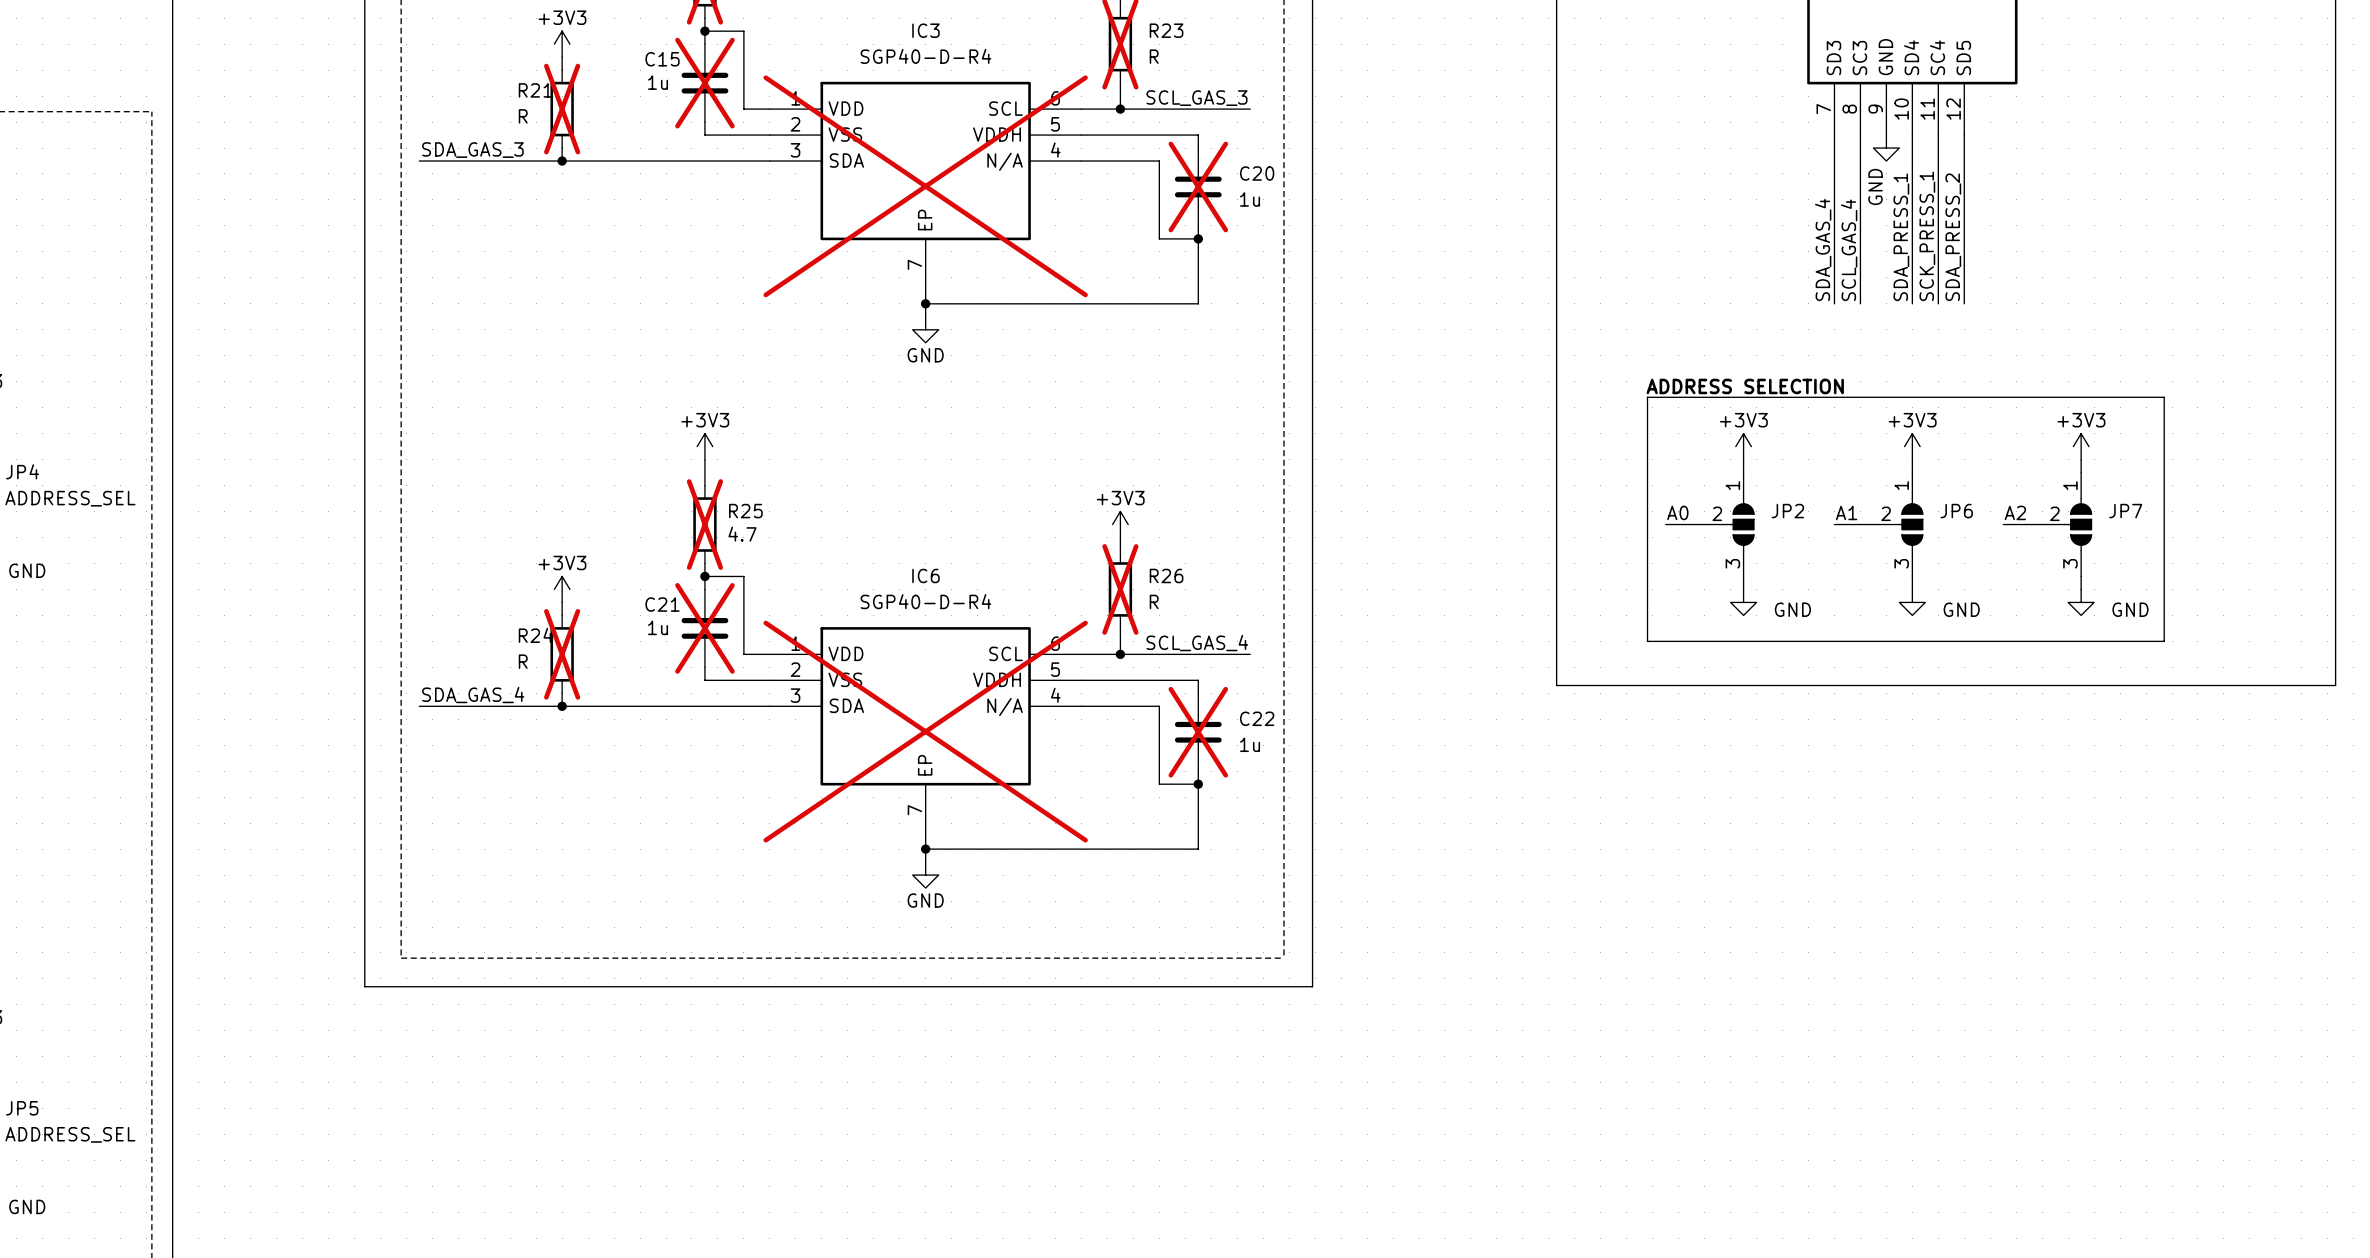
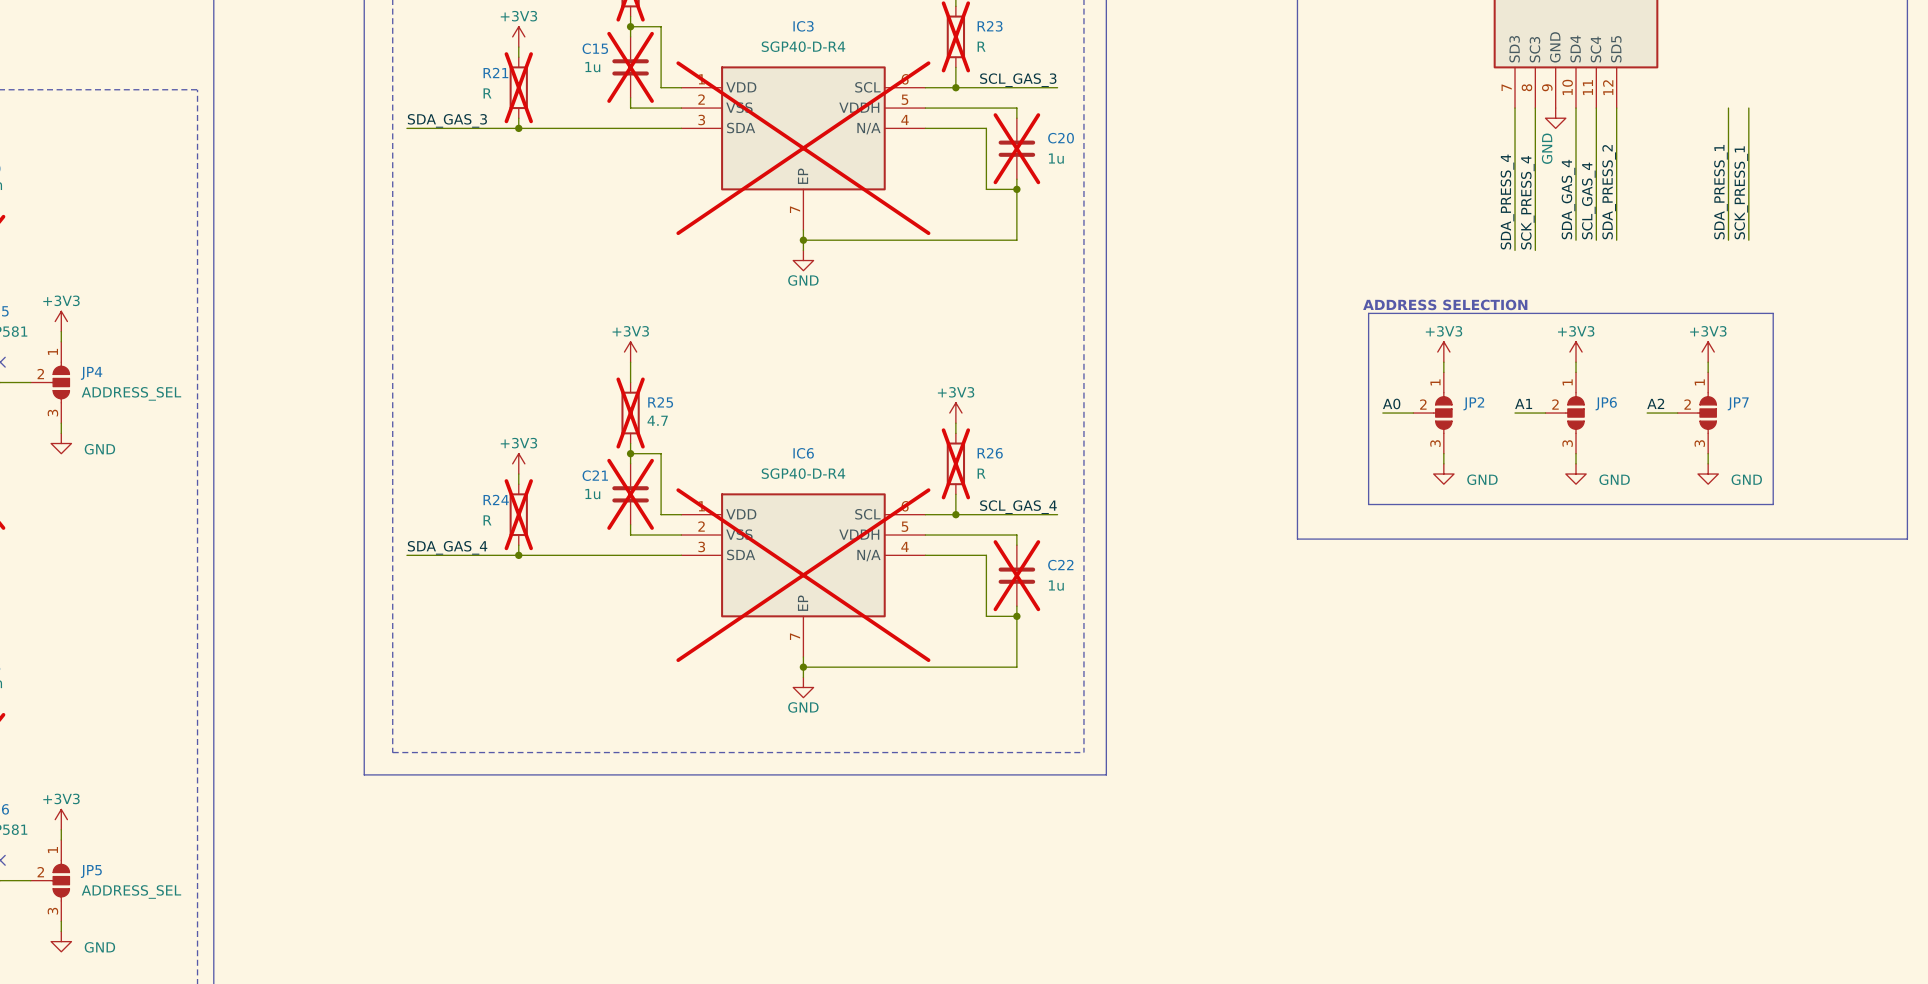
wire: none -> (1728, 108) (1728, 240)
wire: none -> (1748, 108) (1748, 240)
label: SCK_PRESS_1 (1927, 236) -> SCL_GAS_4 (1588, 200)
label: none -> SCK_PRESS_1 (1741, 192)
label: SDA_PRESS_1 (1901, 237) -> SDA_GAS_4 (1568, 199)
label: none -> SDA_PRESS_1 (1720, 192)
label: SDA_GAS_4 (1823, 249) -> SDA_PRESS_4 (1507, 202)
label: none -> SCK_PRESS_4 (1527, 202)
label: SCL_GAS_4 (1849, 250) -> none
wire: none -> (1515, 240) (1515, 250)
wire: none -> (1535, 240) (1535, 250)

